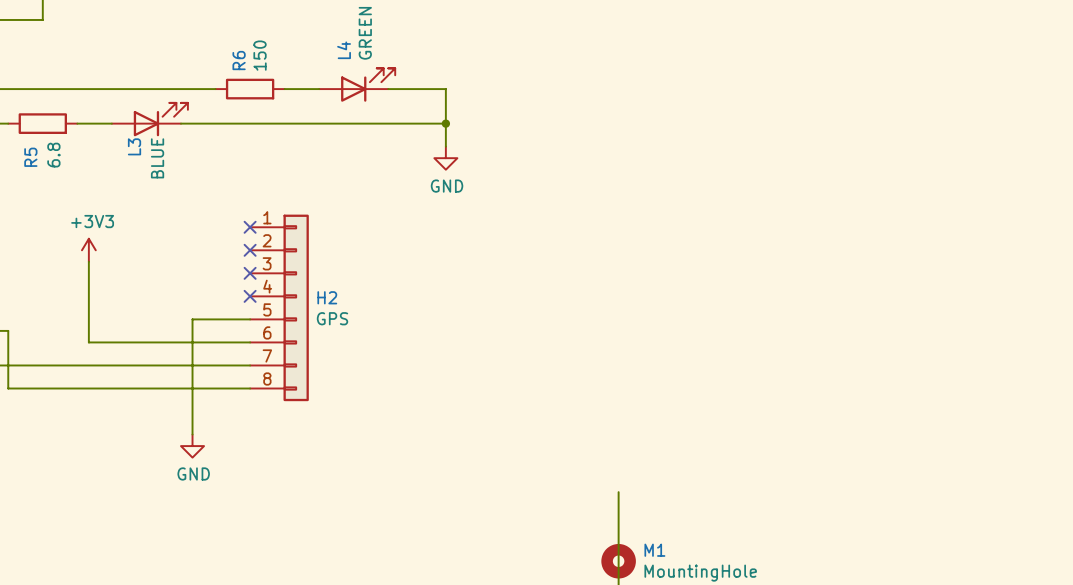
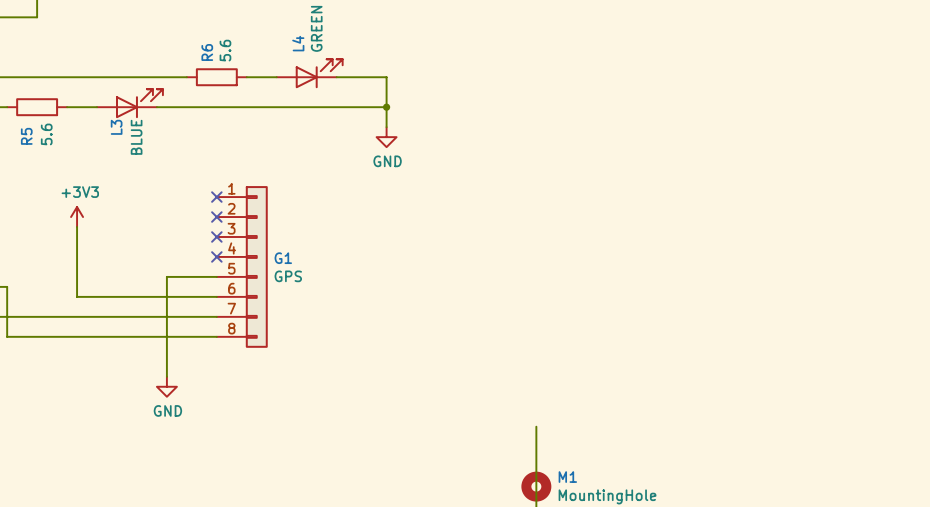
R6 value: 150 (260, 55) -> 5.6 (225, 50)
R5 value: 6.8 (53, 155) -> 5.6 (46, 134)
H2 name: H2 (327, 297) -> G1 (283, 258)

